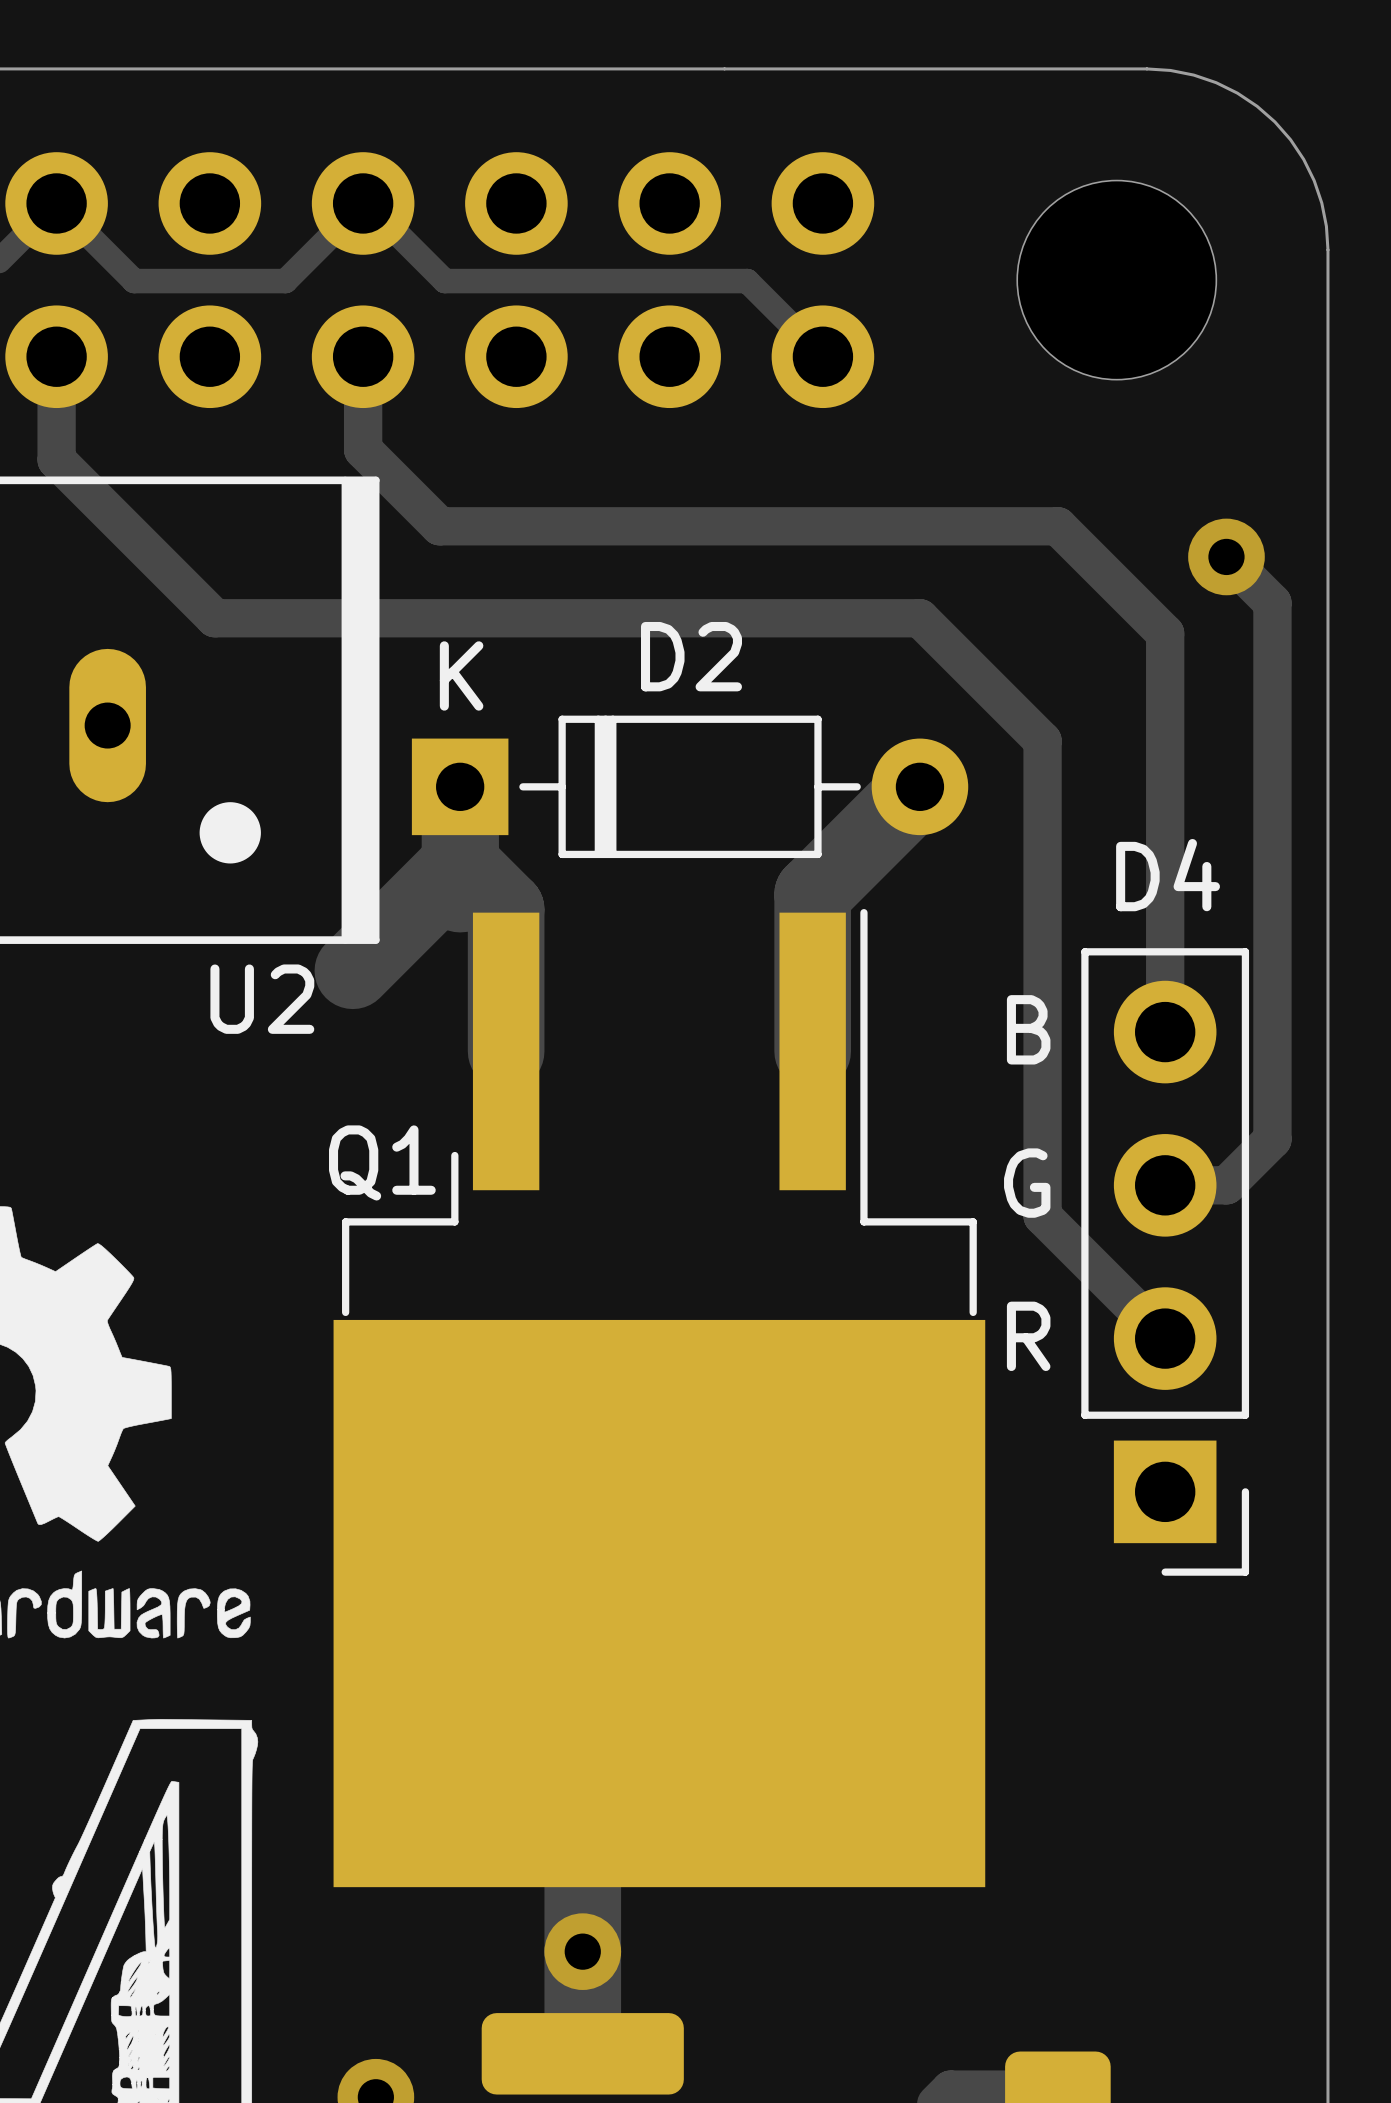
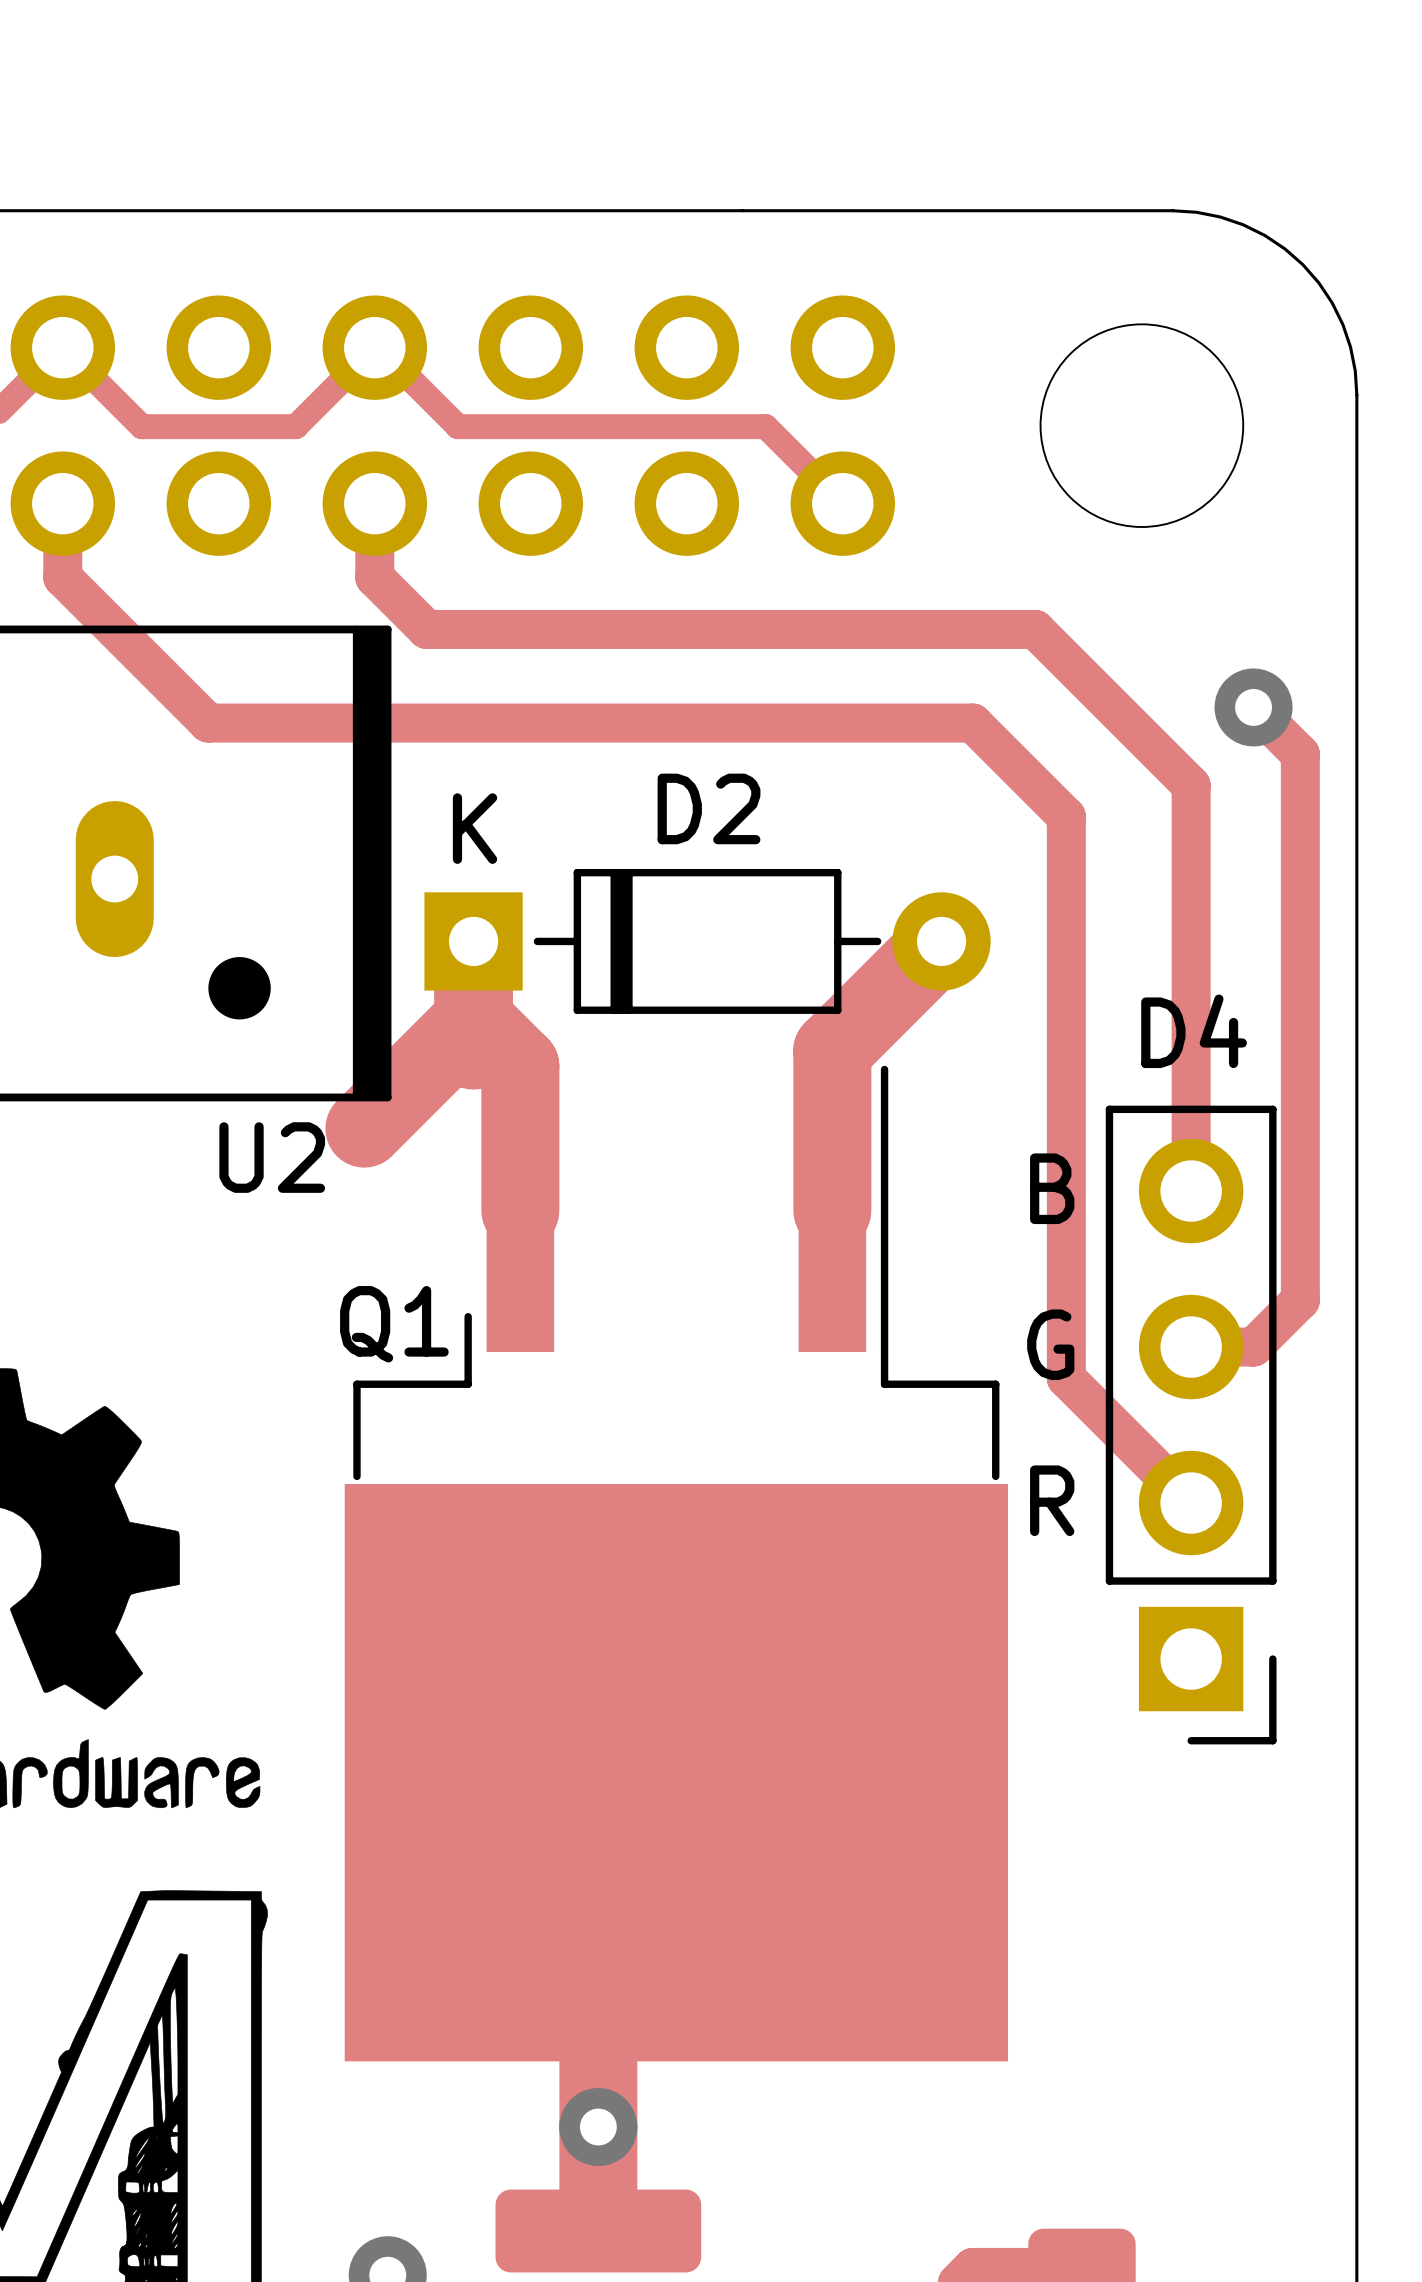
track: (56, 429) (56, 459) (214, 618) (919, 618) (1042, 740) -> (62, 577) (208, 723) (972, 723) (1066, 816) (1066, 894)
track: (363, 429) (363, 449) (439, 526) (1057, 526) -> (374, 577) (426, 629) (1035, 629) (1081, 676)

